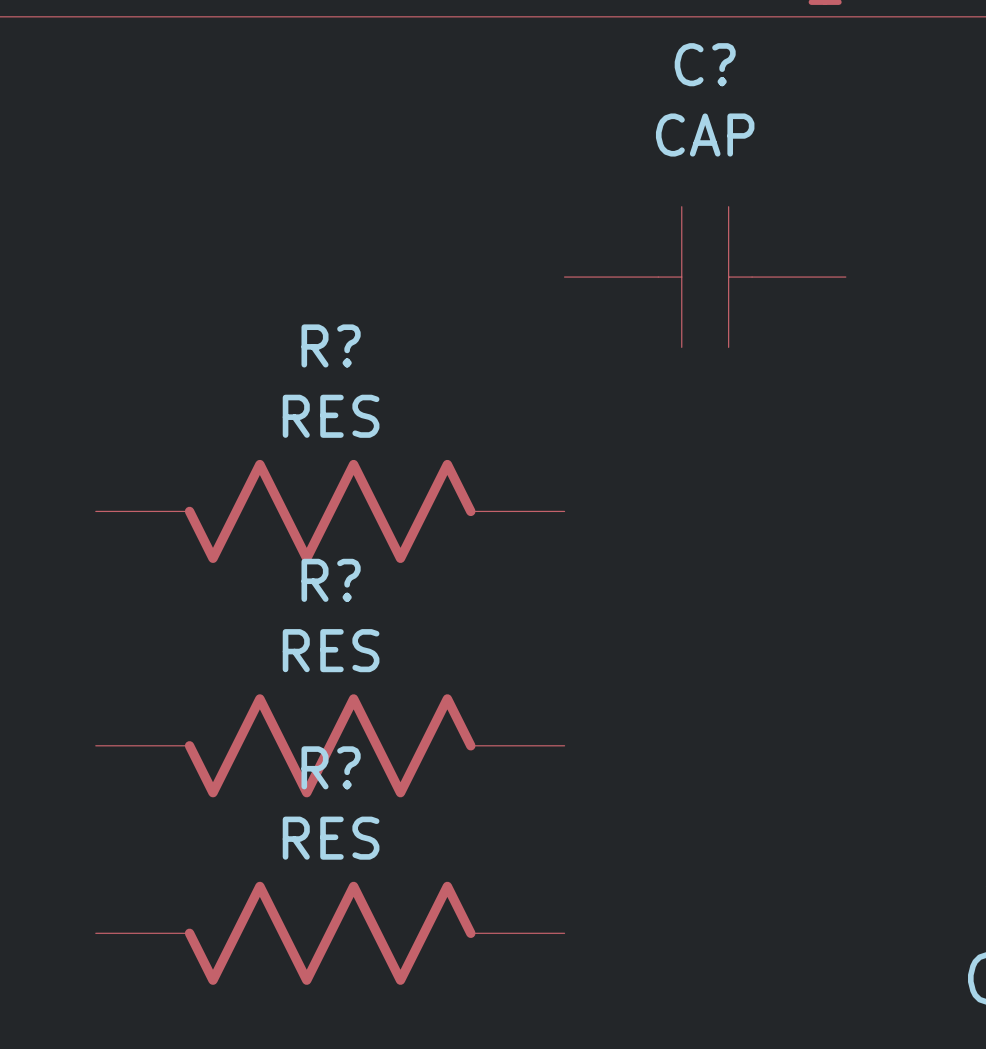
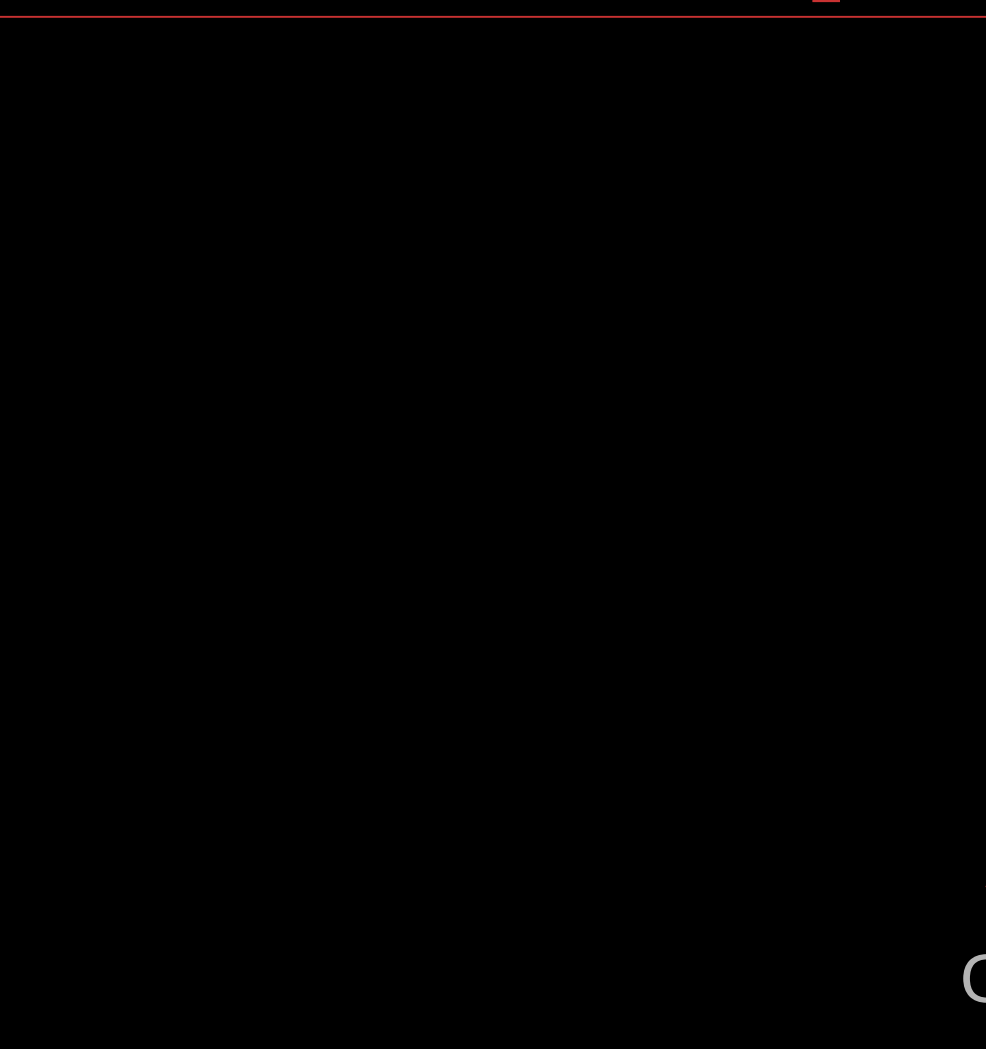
C?: CAP (705, 277) -> none
R?: RES (330, 511) -> none
R?: RES (330, 745) -> none
R?: RES (330, 933) -> none

